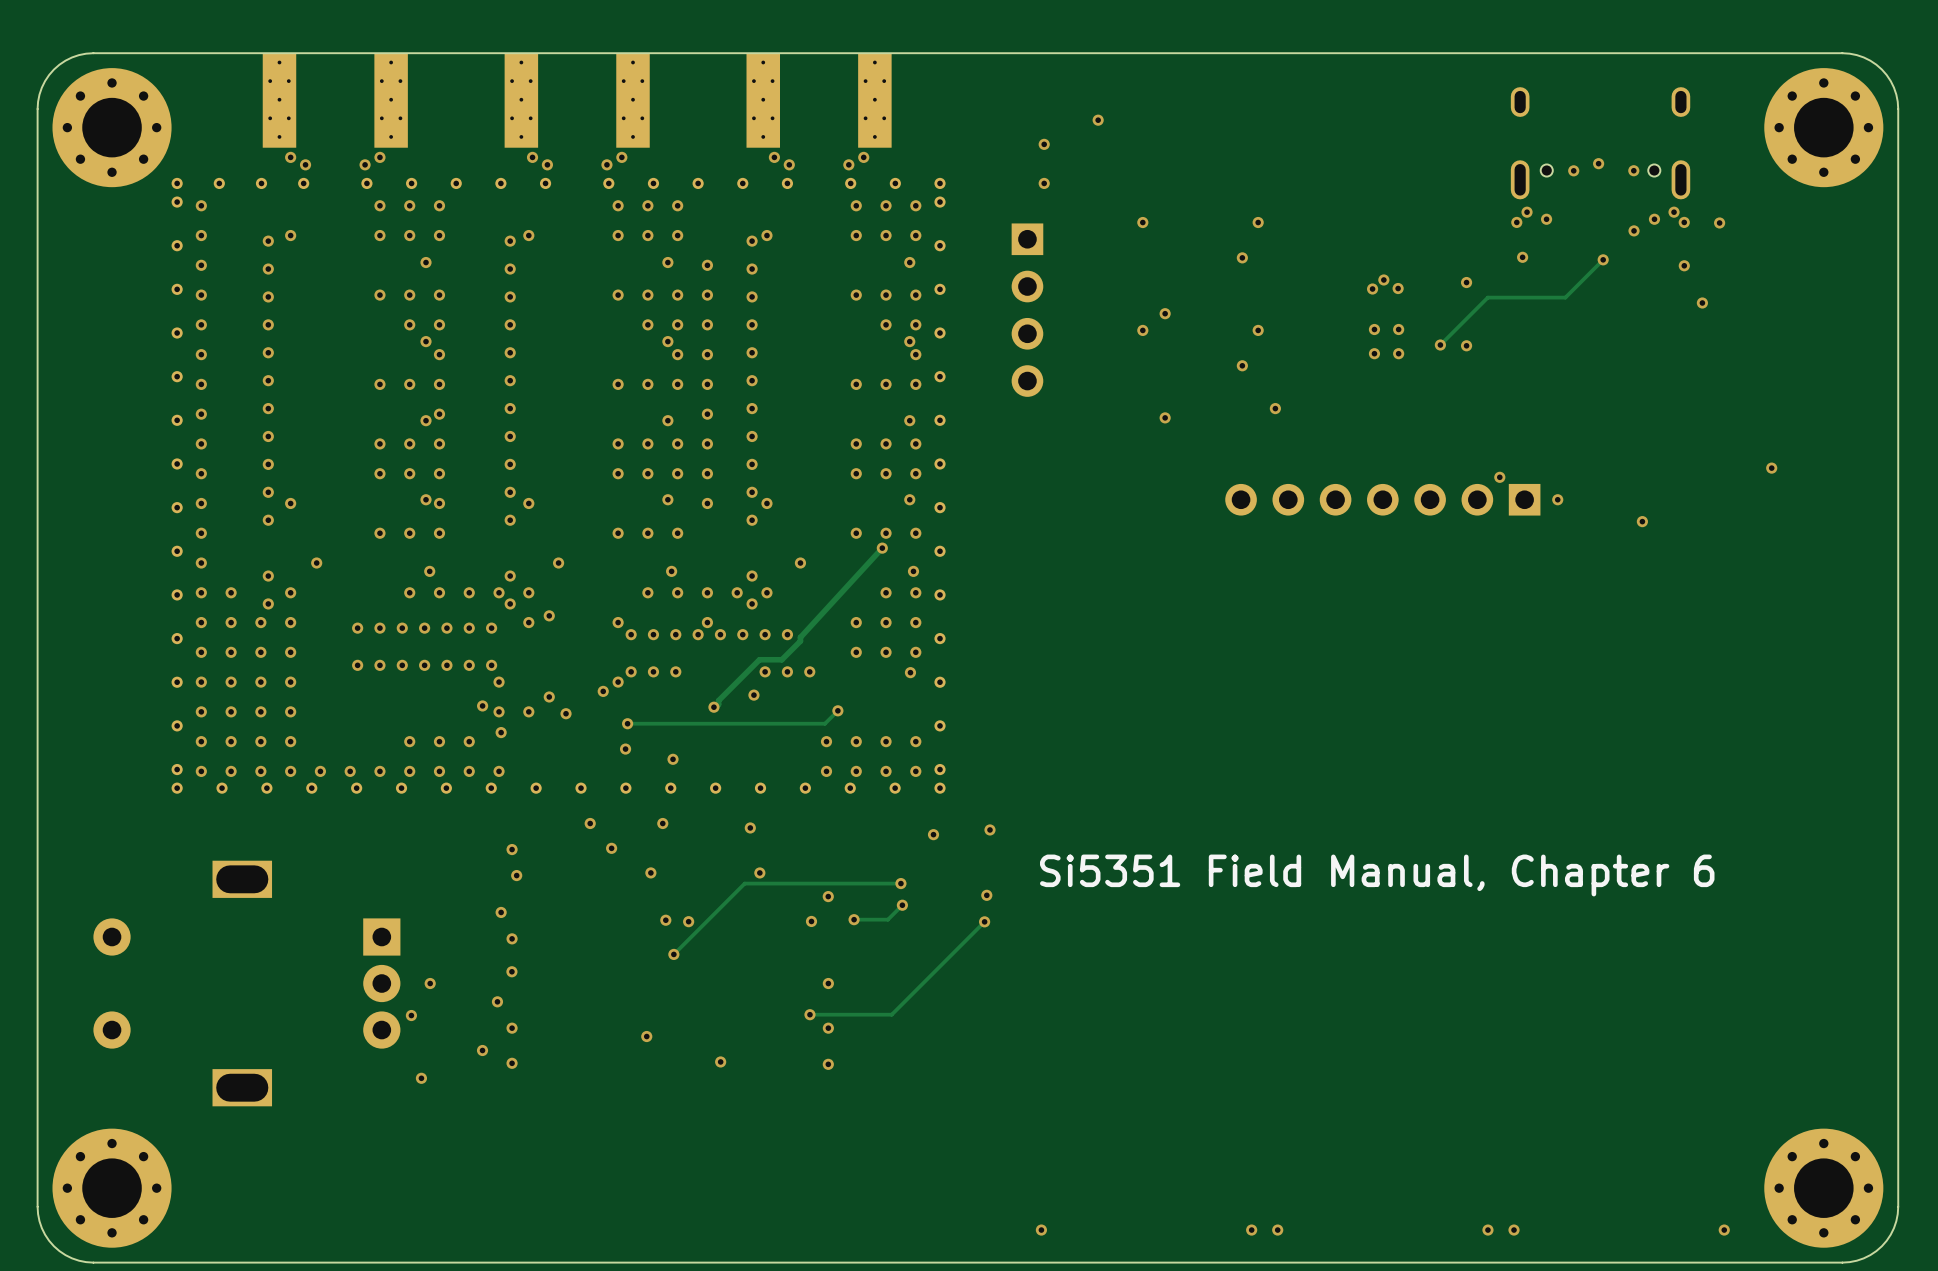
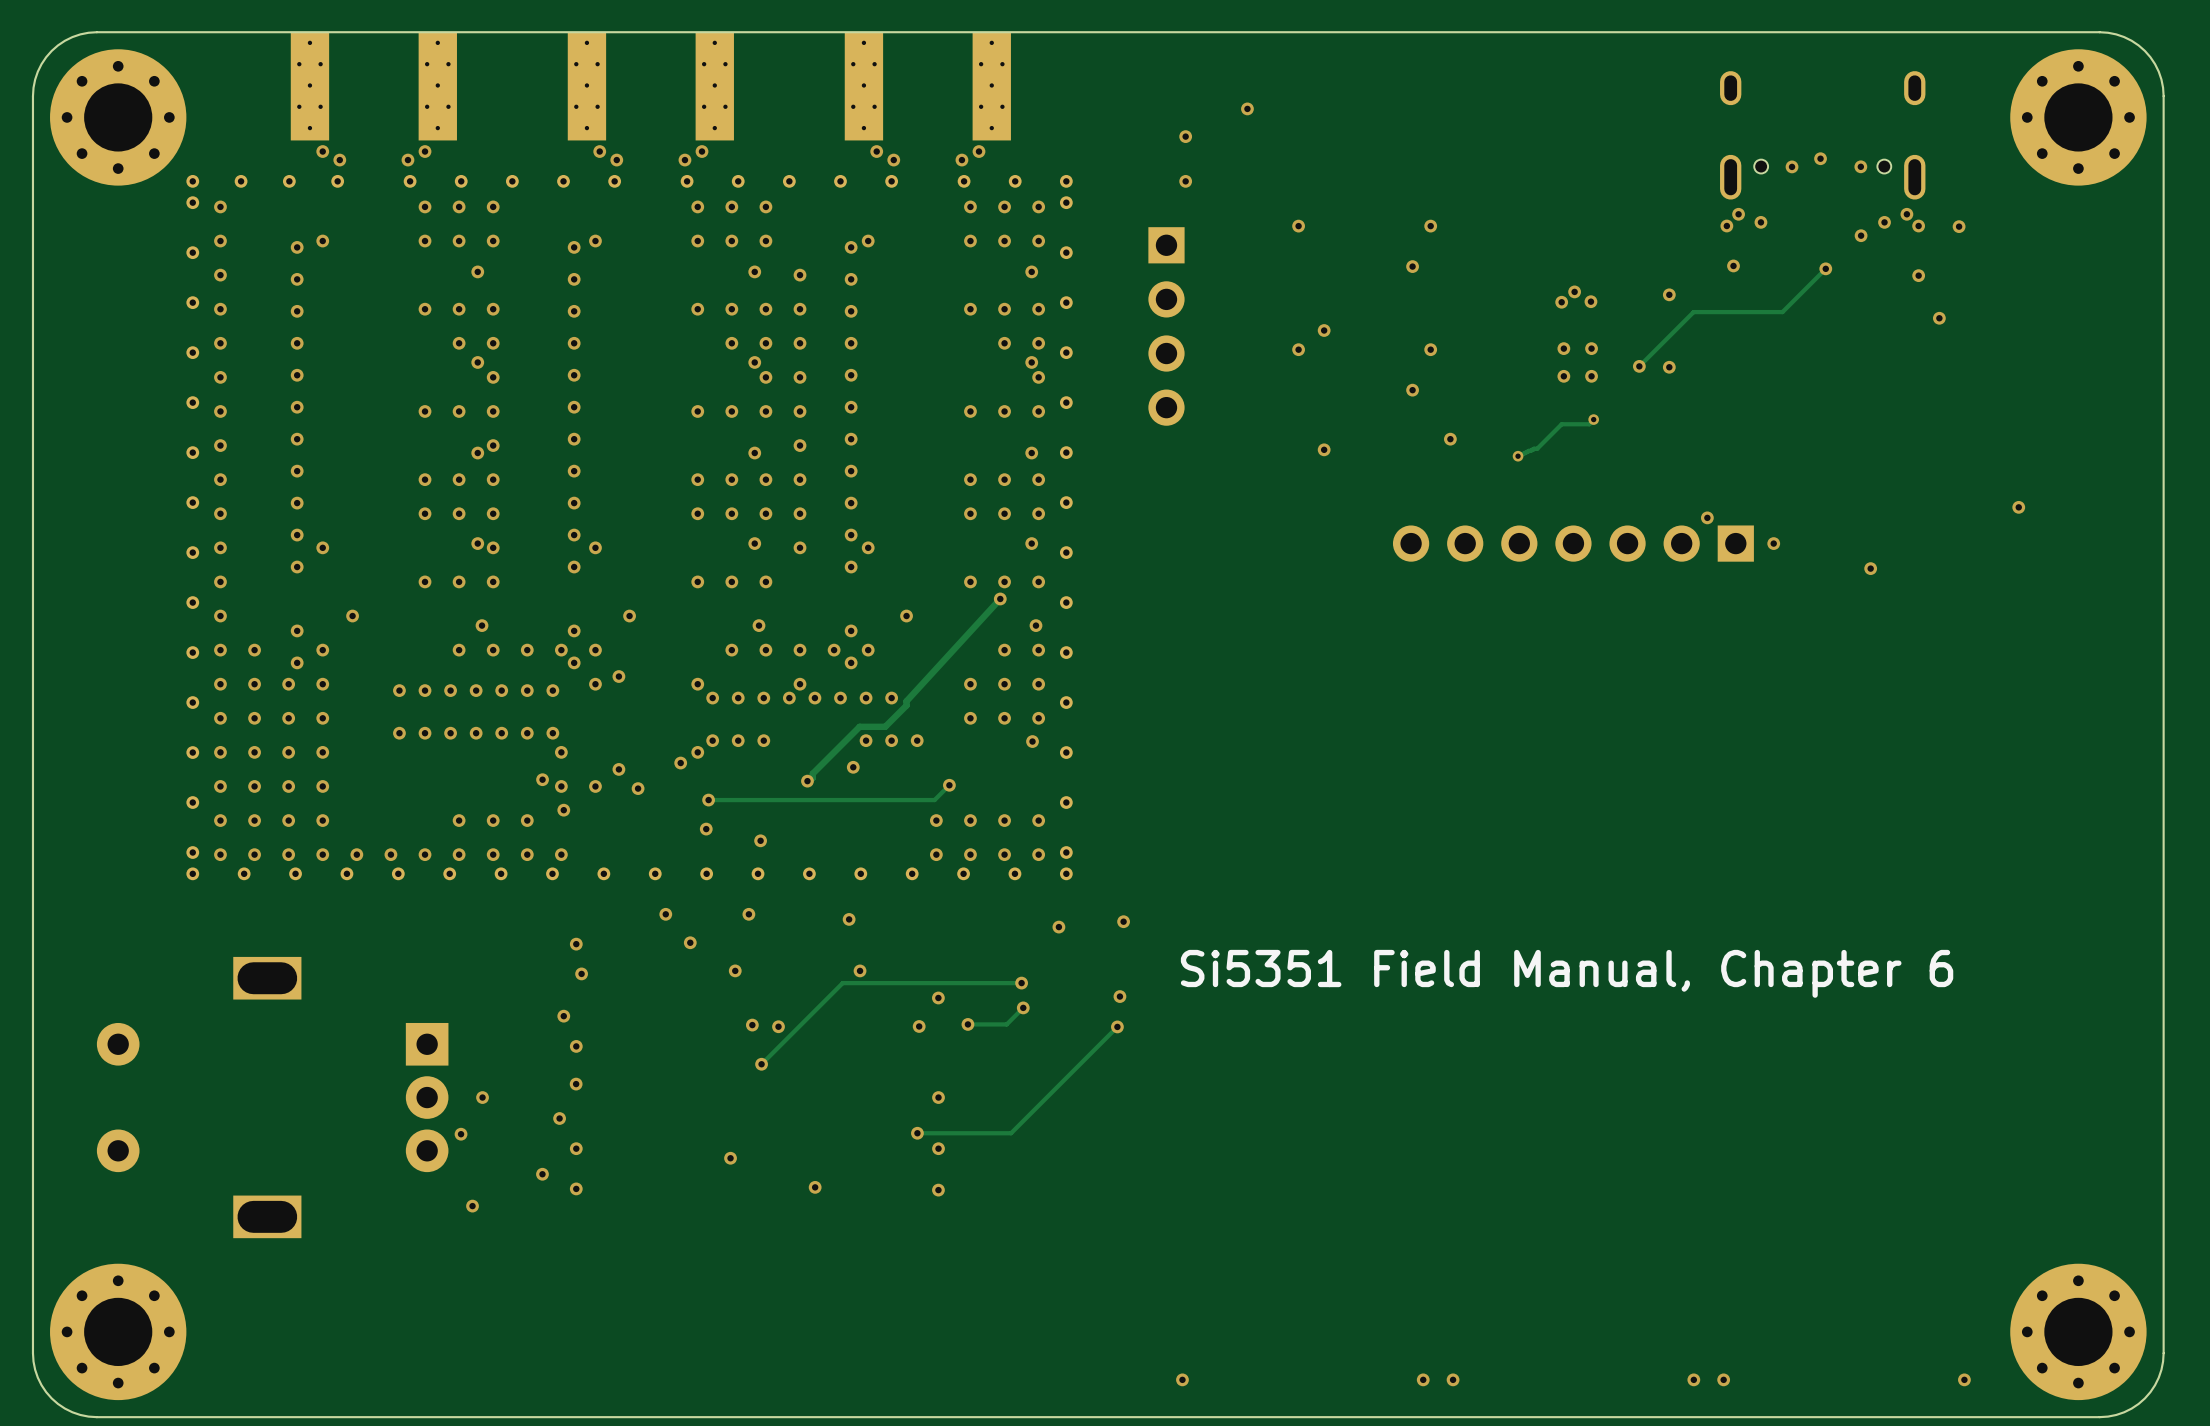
track: none -> (1593, 419) (1589, 424) (1561, 424) (1537, 448) (1518, 456)
via: none -> (1593, 419)
via: none -> (1518, 456)

